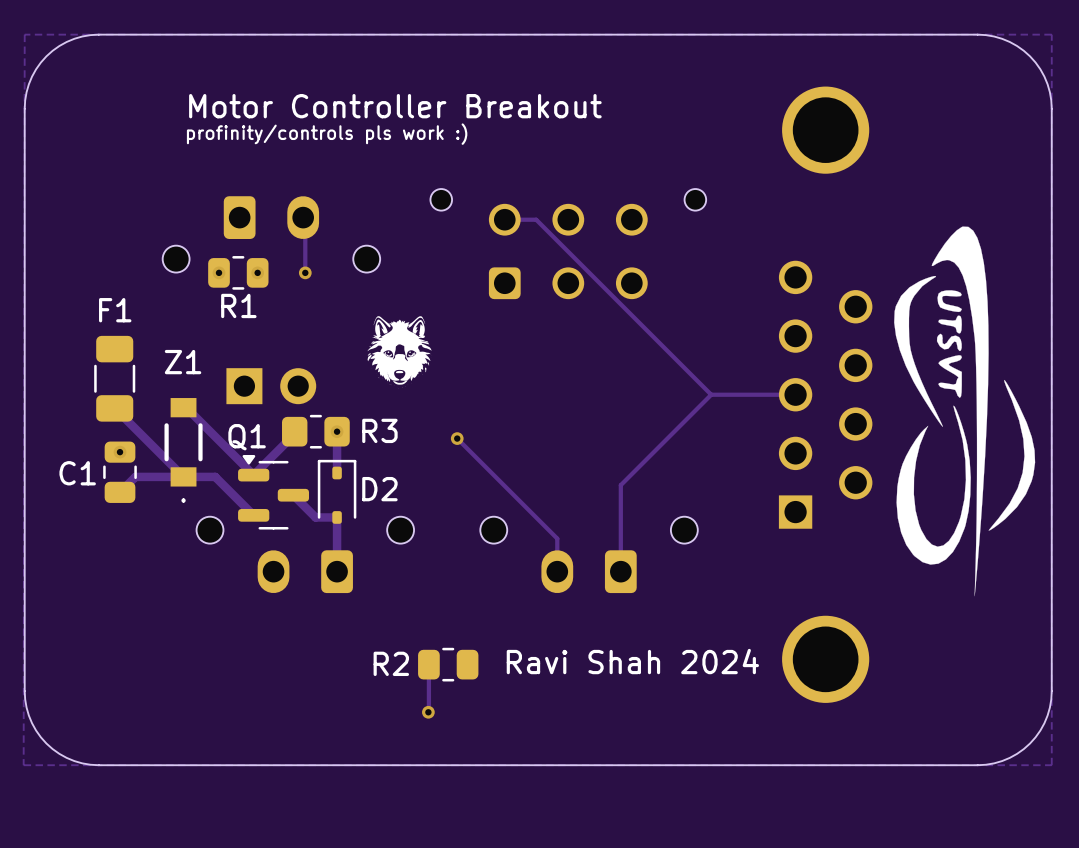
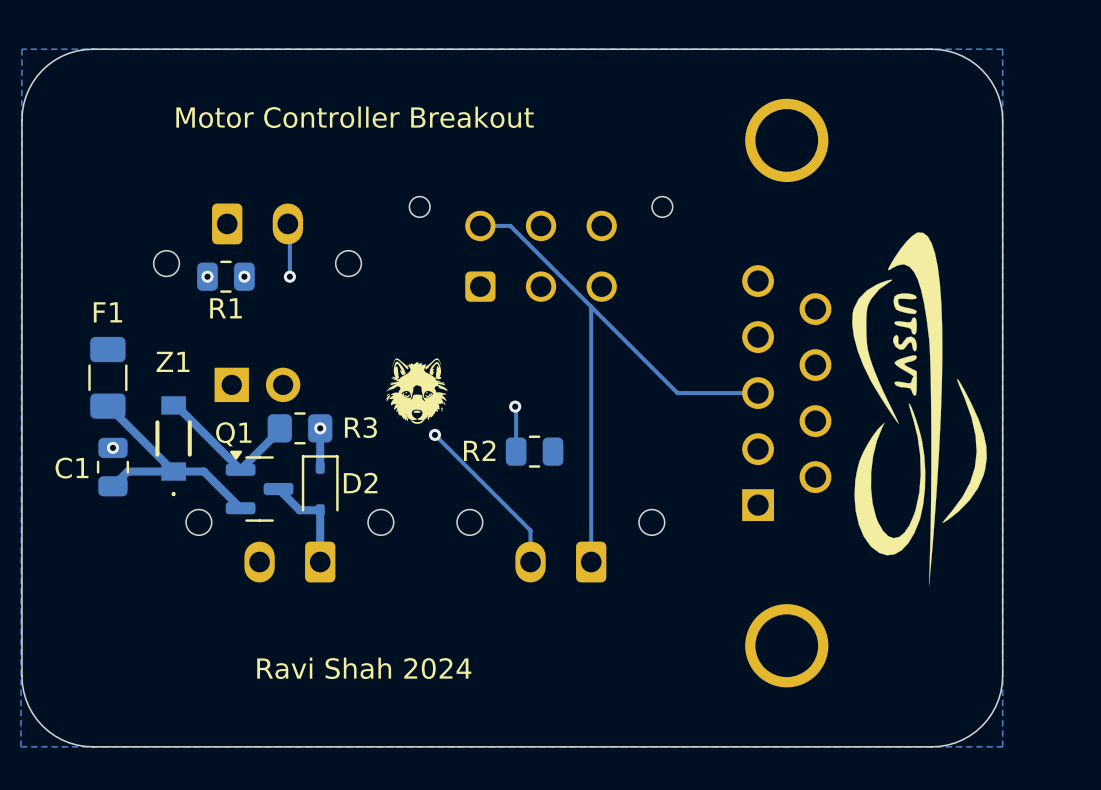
text: profinity/controls pls work :) (327, 134) -> none
drawing position: (399, 352) -> (417, 392)
track: (711, 394) (620, 485) -> (591, 306) (591, 479)
track: none -> (515, 406) (516, 451)
via: none -> (515, 406)
text position: Ravi Shah 2024 (632, 661) -> Ravi Shah 2024 (364, 668)
track: (428, 664) (429, 713) -> none
R2 position: (448, 664) -> (534, 451)
via: (428, 712) -> none

